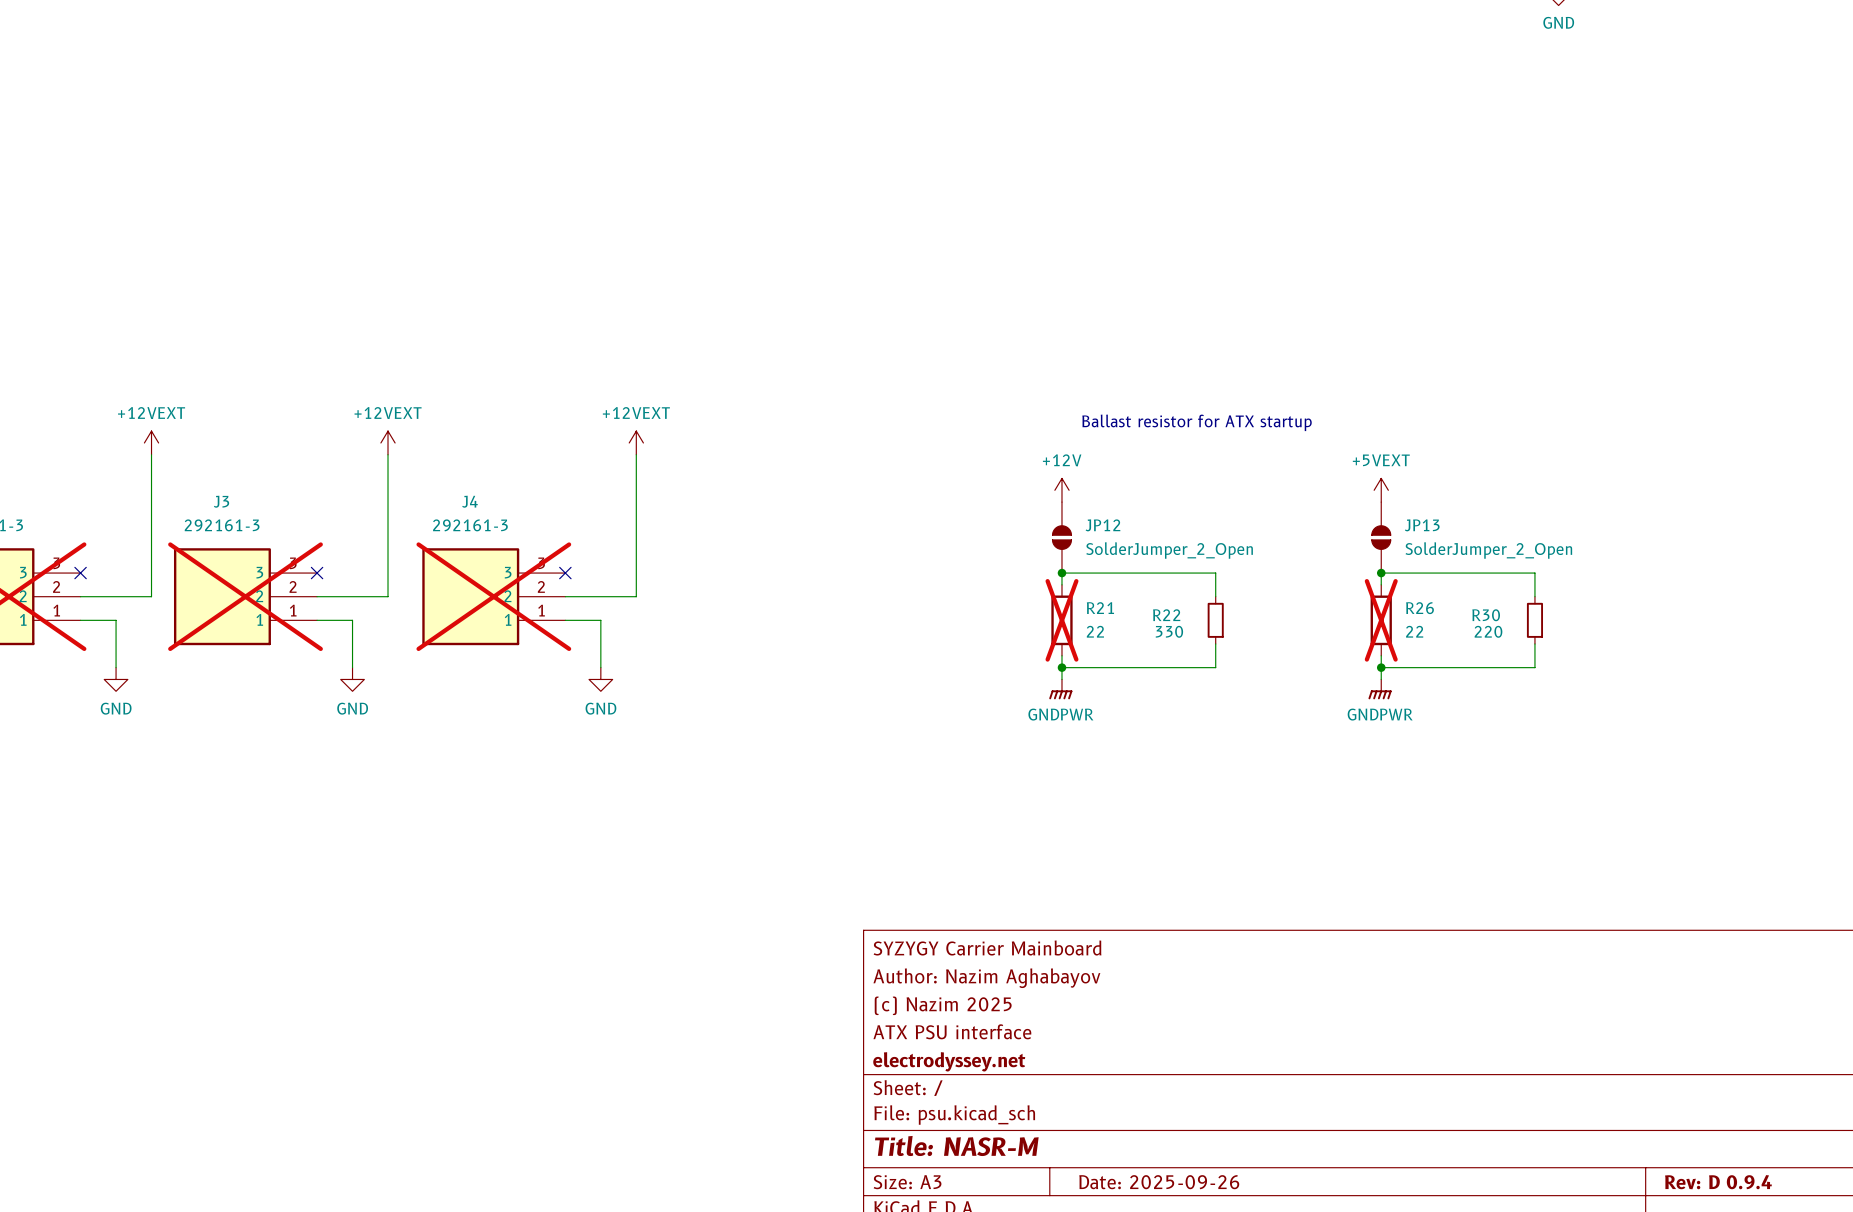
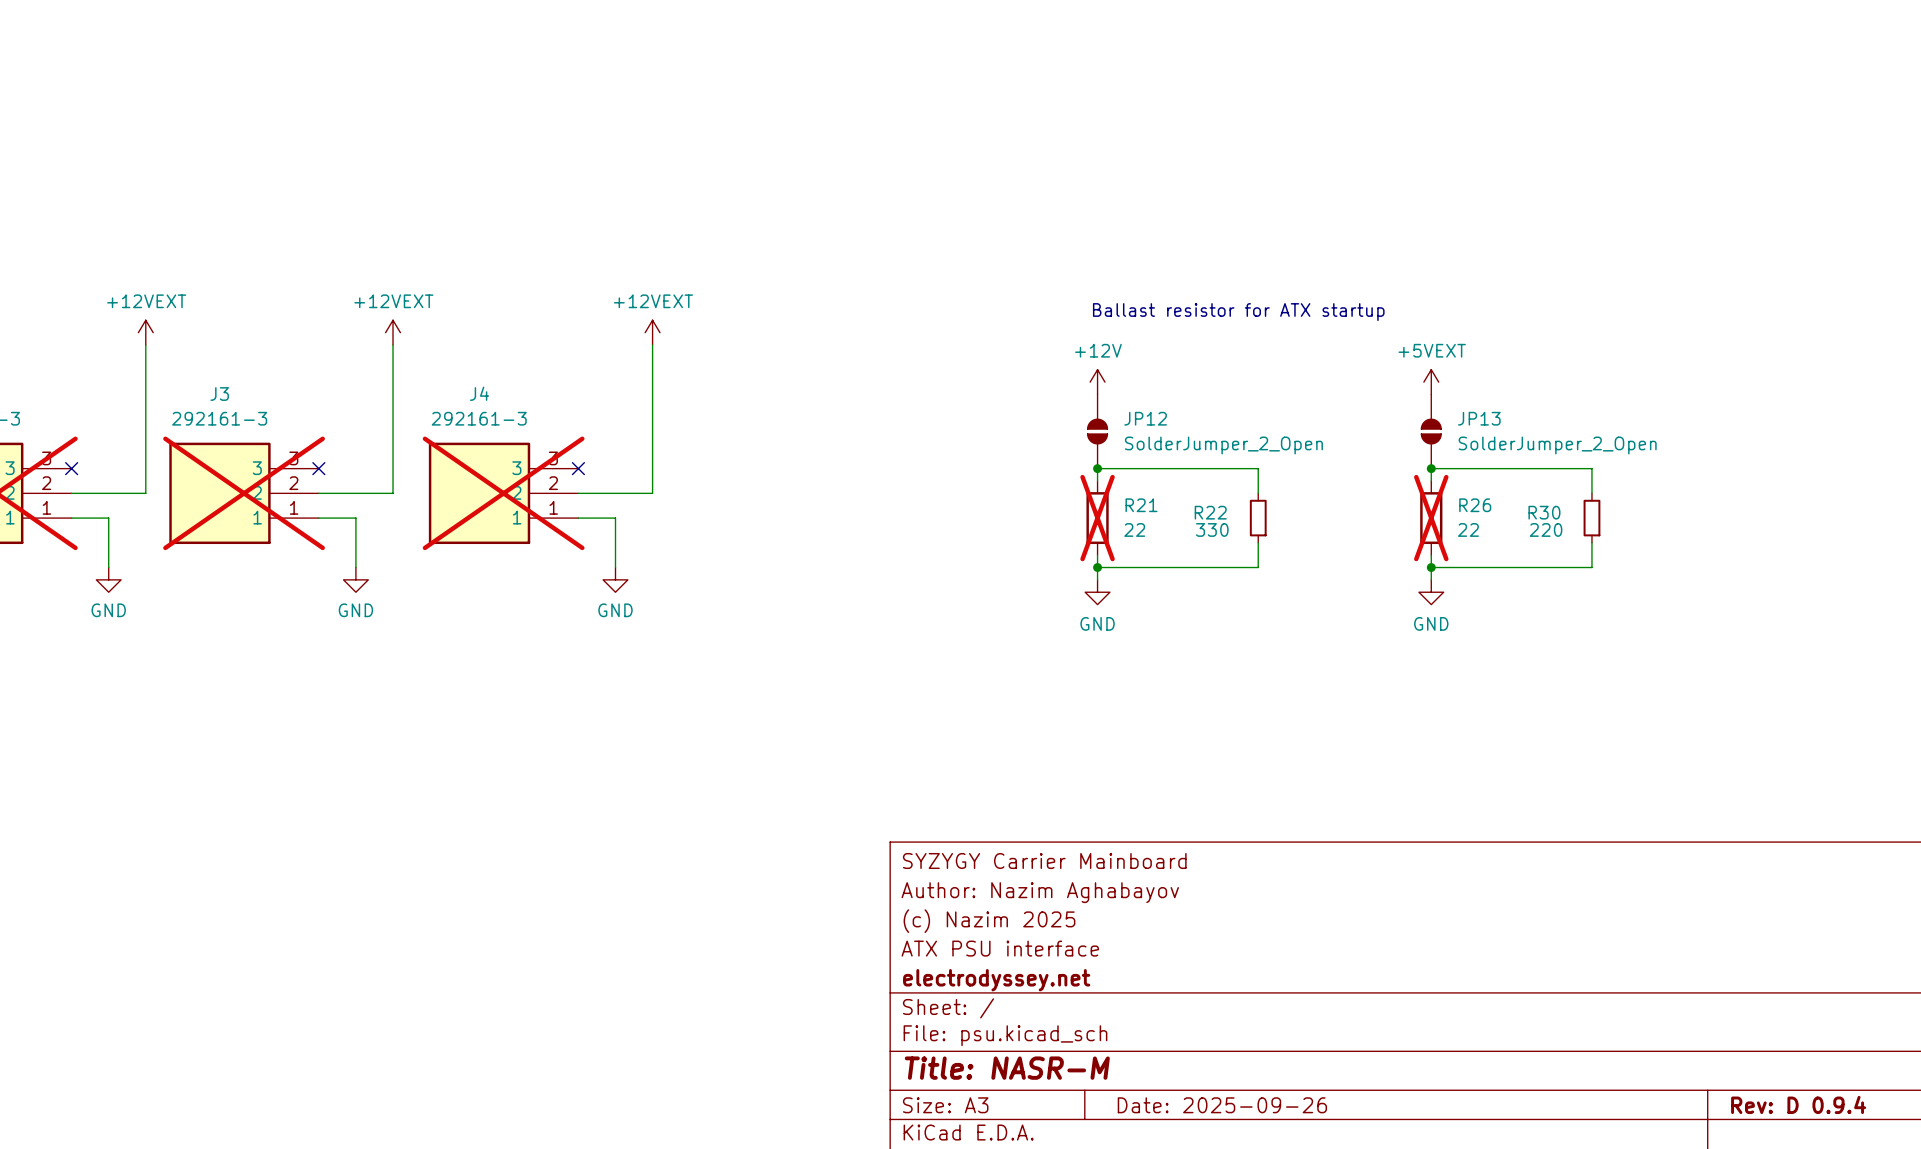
power symbol: GNDPWR (1060, 689) -> GND (1097, 592)
power symbol: GNDPWR (1380, 689) -> GND (1431, 592)

